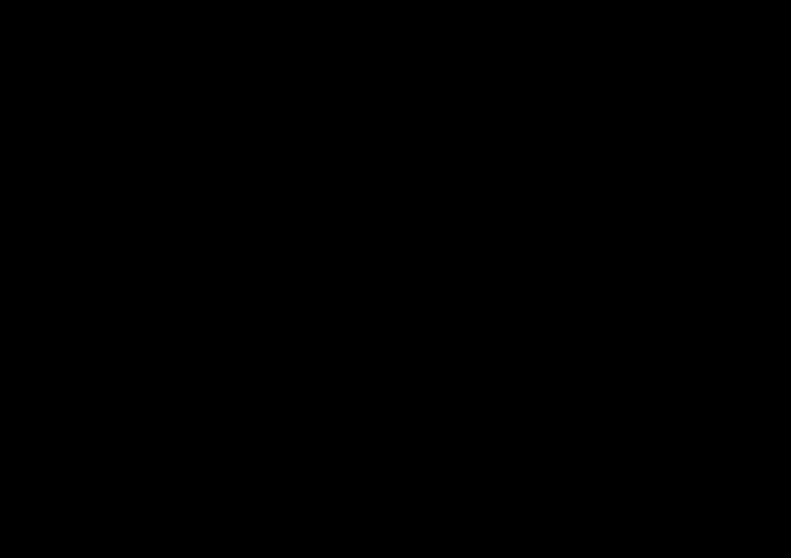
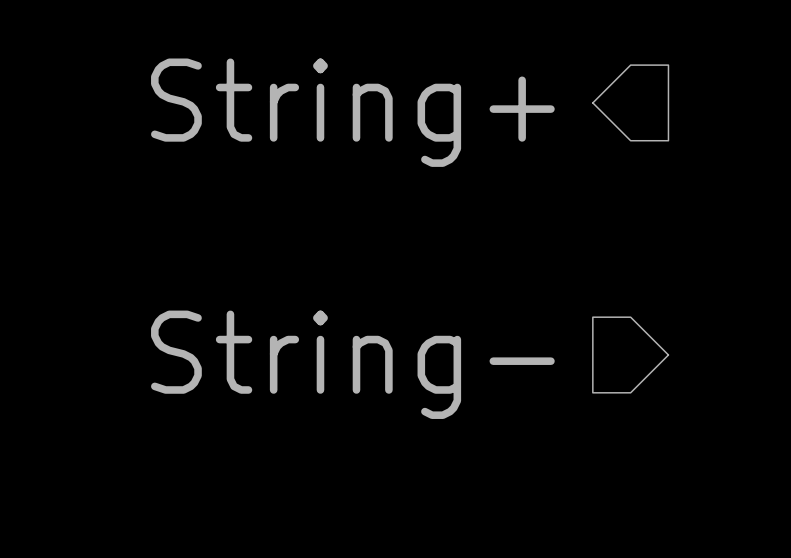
hierarchical label: none -> String+ (352, 112)
hierarchical label: none -> String- (352, 364)

